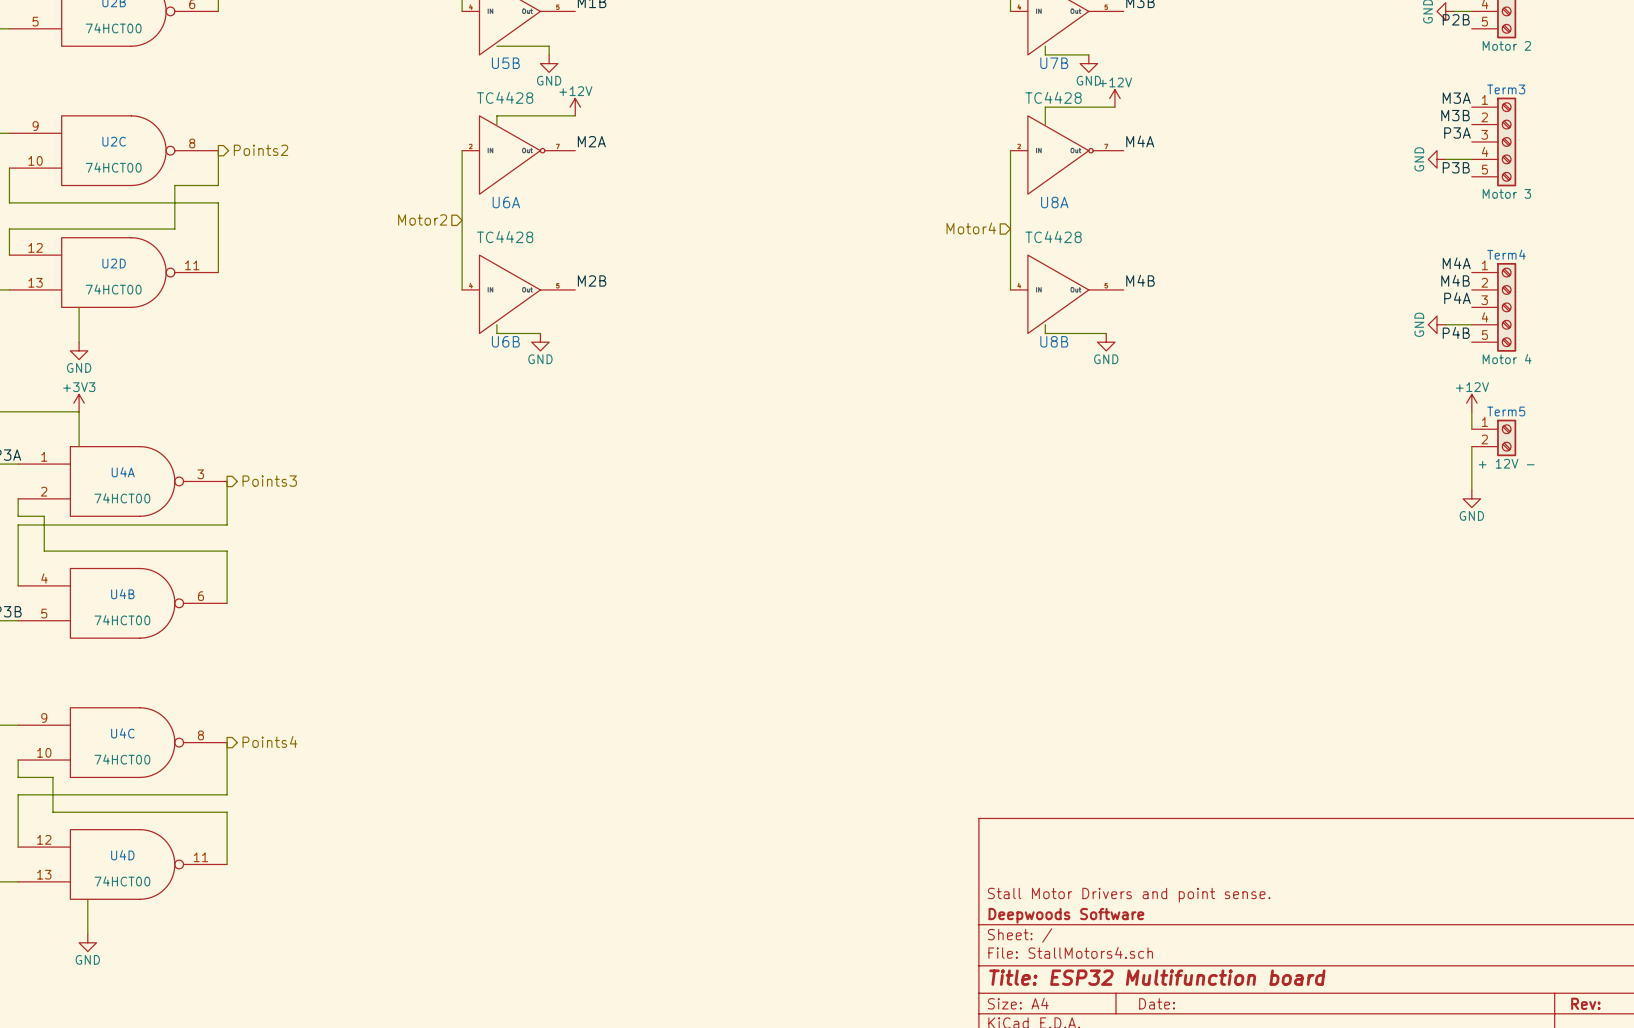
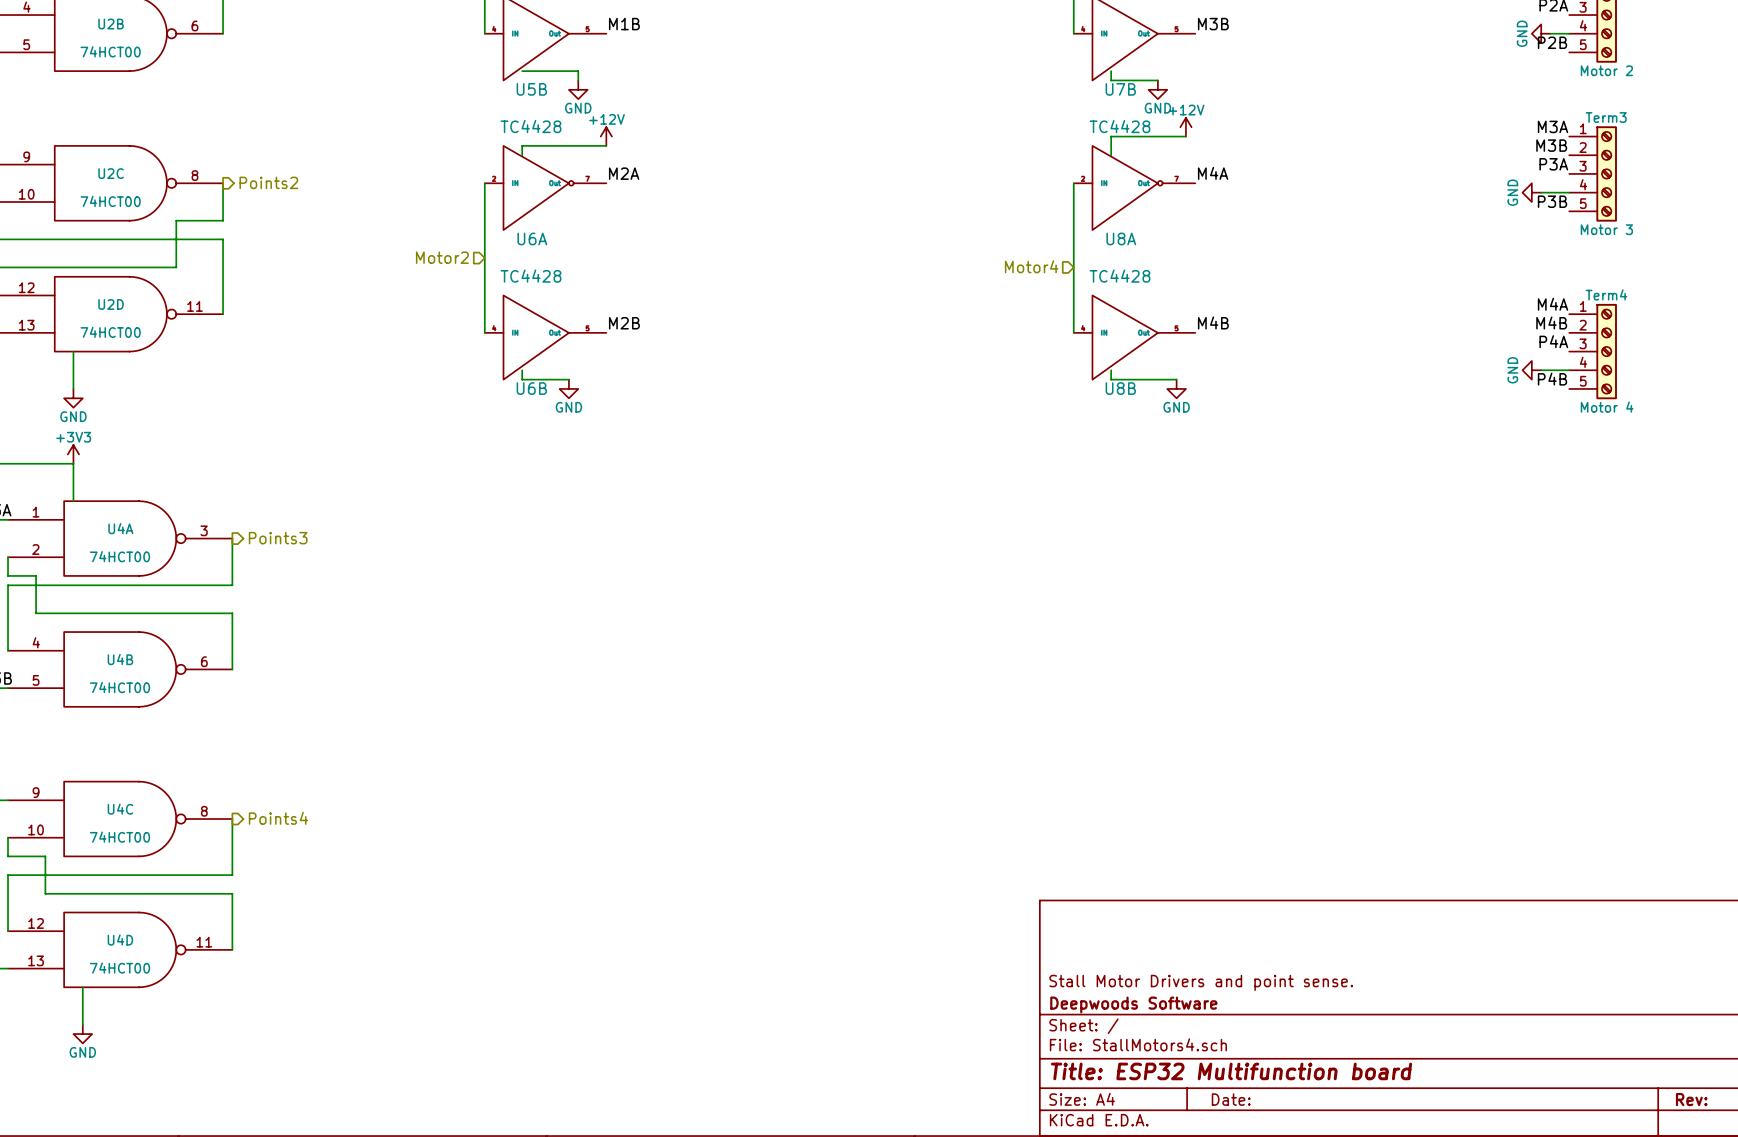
power symbol: +12V (1471, 403) -> none
wire: (1471, 411) (1471, 429) -> none
Term5: + 12V - (1494, 437) -> none
wire: (1471, 446) (1471, 490) -> none
power symbol: GND (1471, 498) -> none

